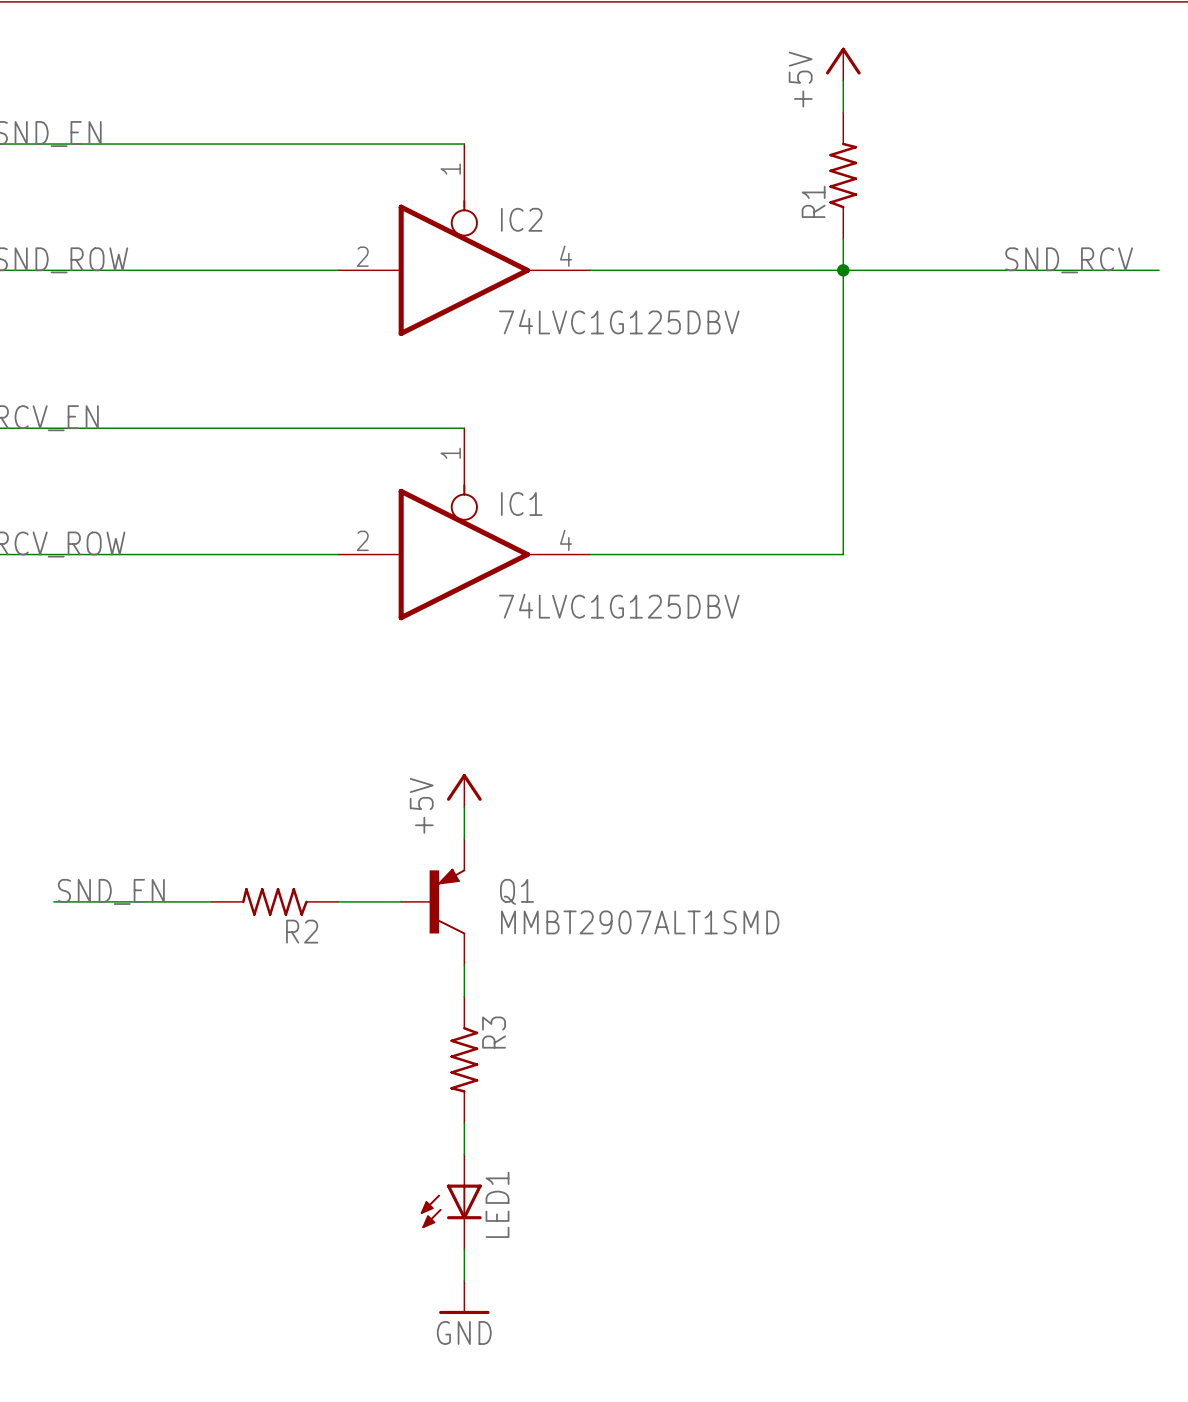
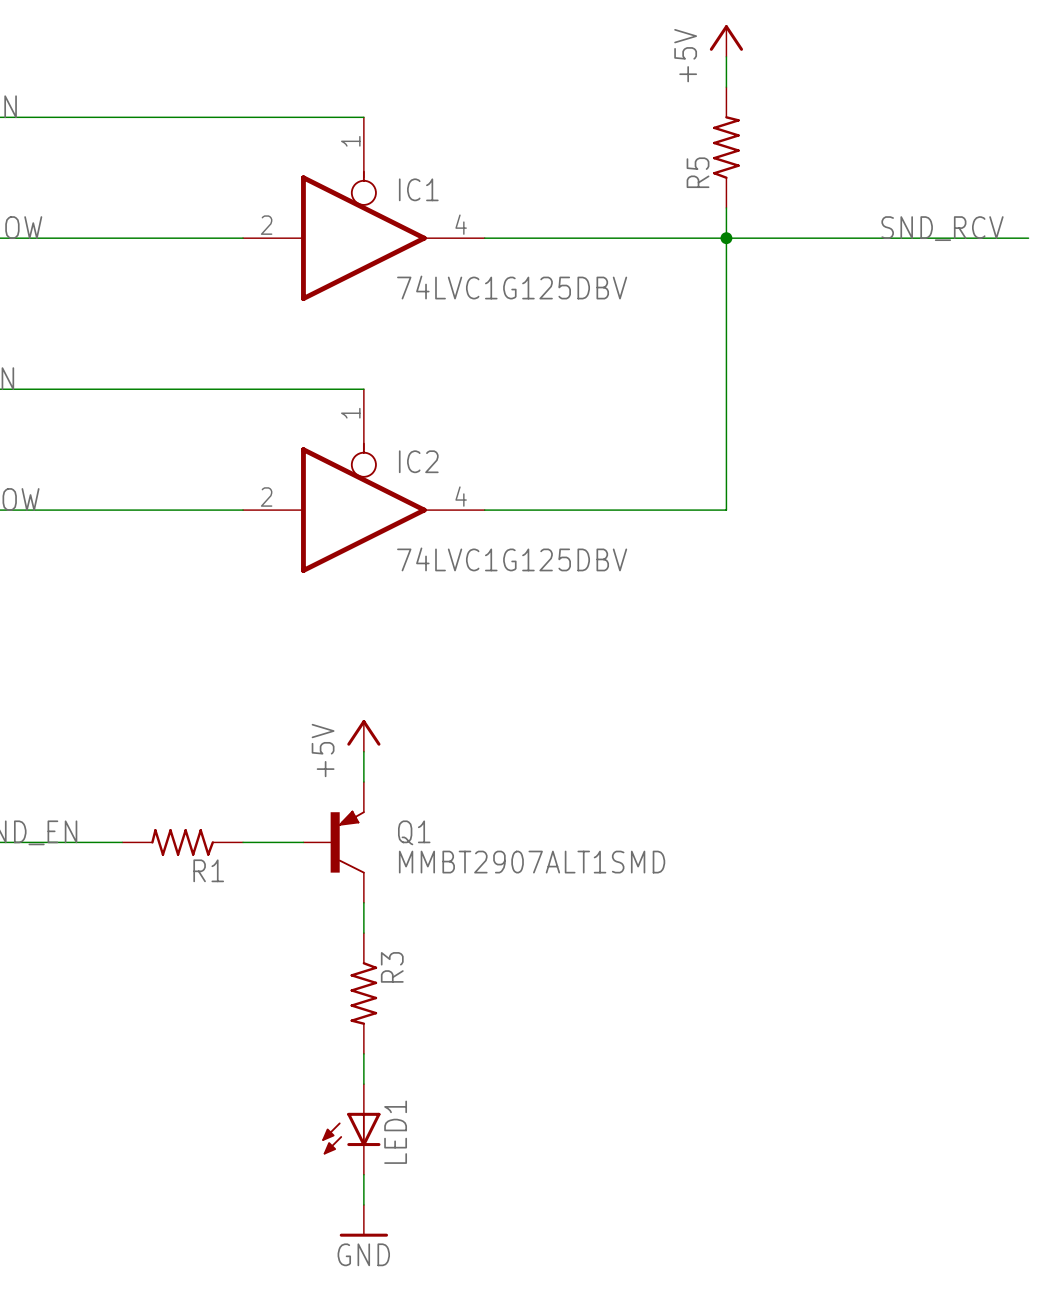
R1 name: R1 (813, 201) -> R5 (698, 172)
IC2 name: IC2 (521, 219) -> IC1 (418, 189)
IC1 name: IC1 (521, 504) -> IC2 (418, 461)
R2 name: R2 (302, 931) -> R1 (208, 870)

